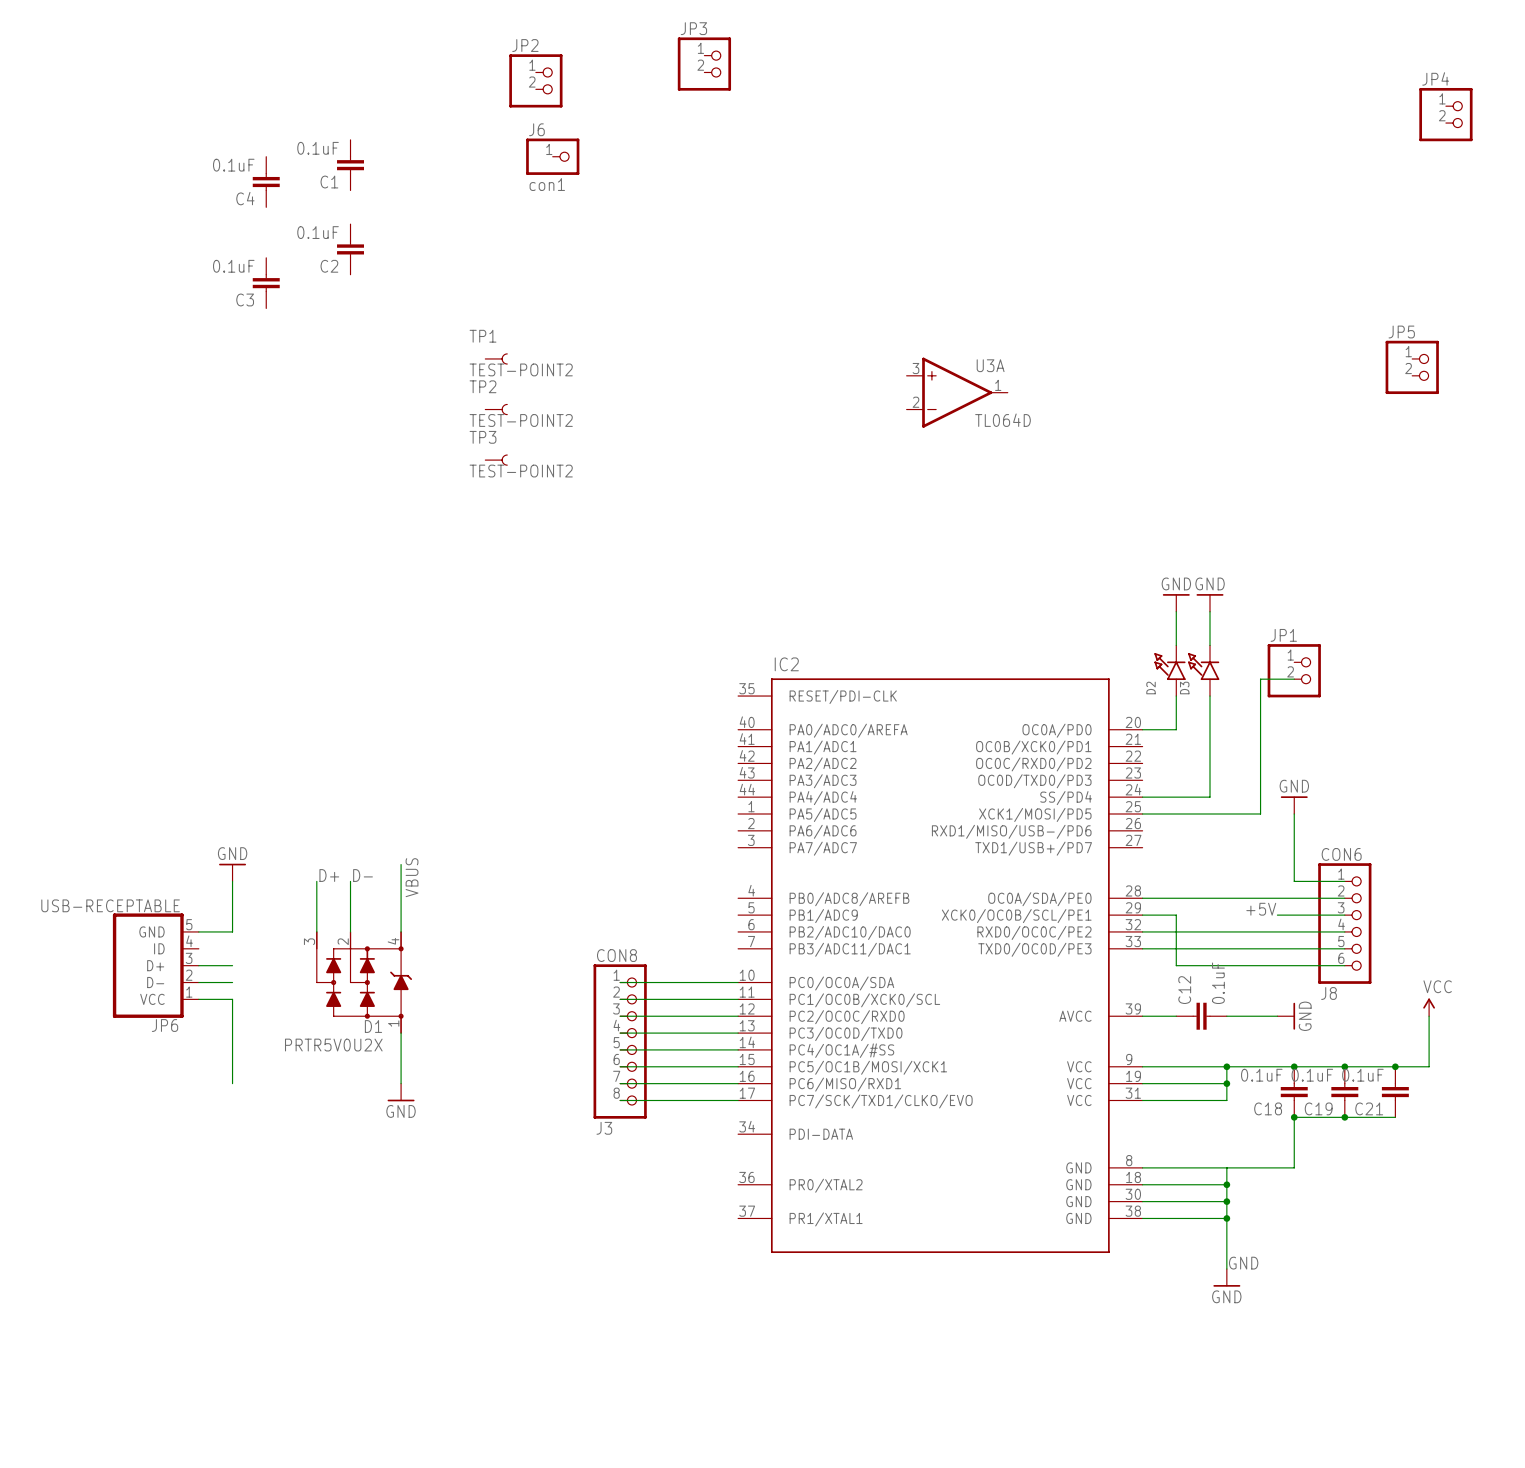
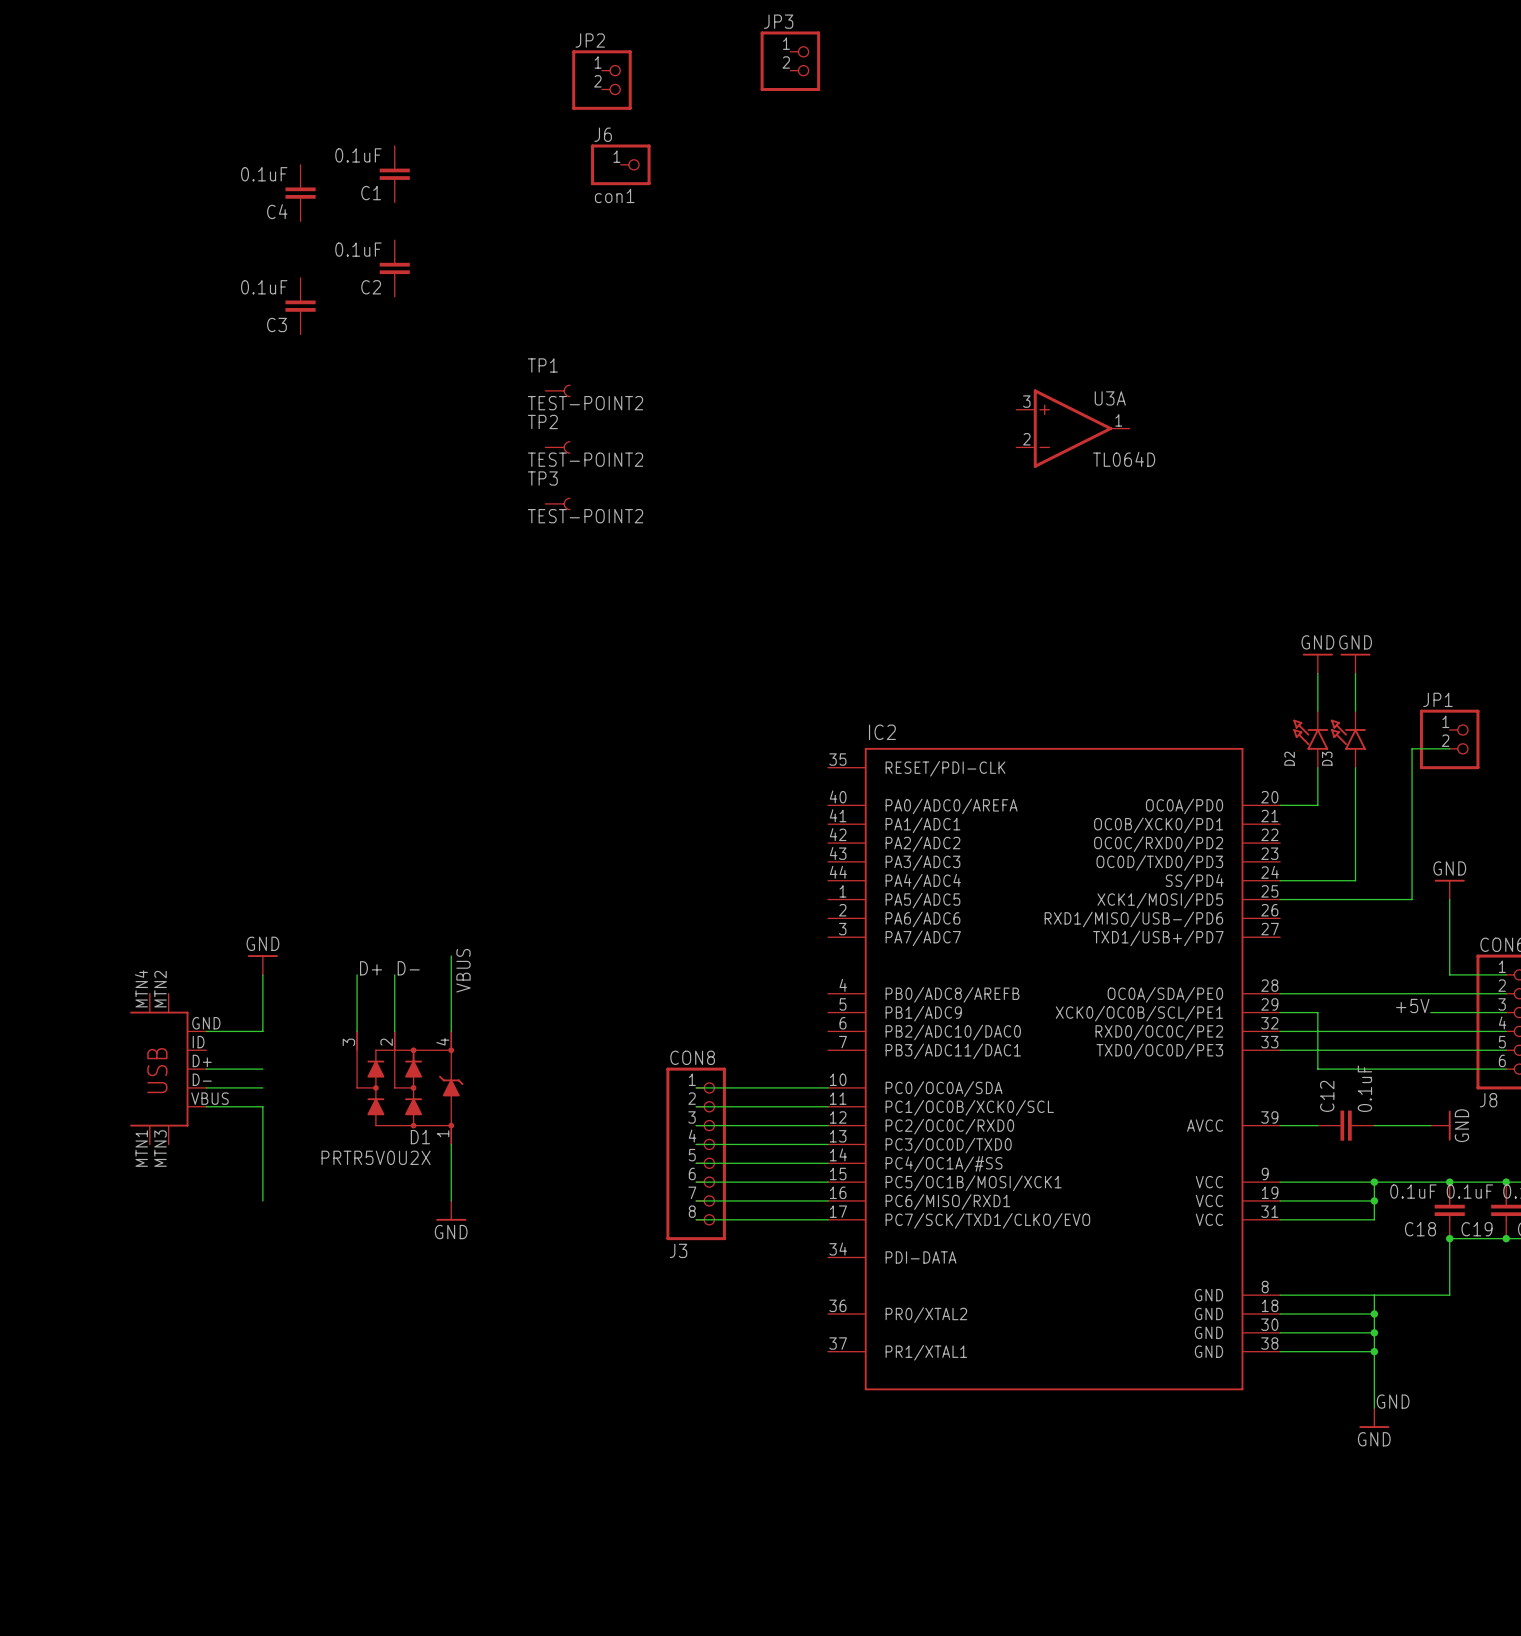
part: none -> (168, 1069)
JP6: USB-RECEPTABLE (155, 965) -> none

